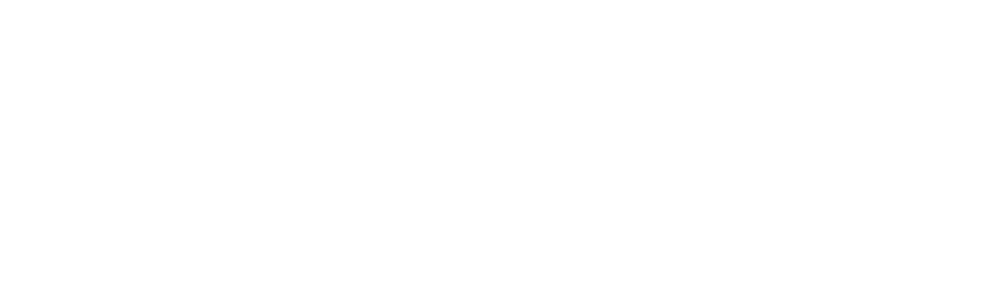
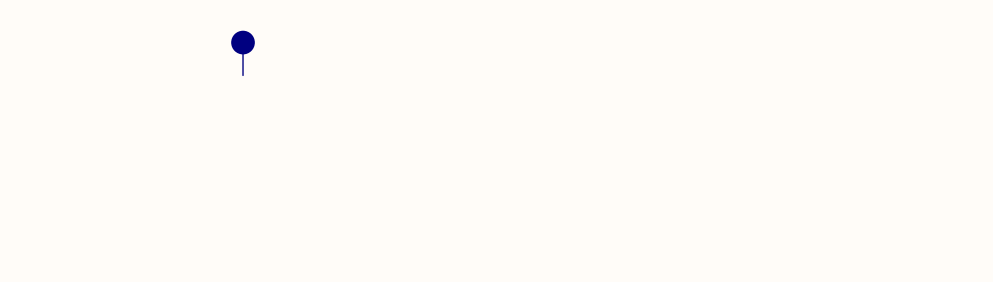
wire: none -> (243, 42) (243, 75)
junction: none -> (243, 42)

